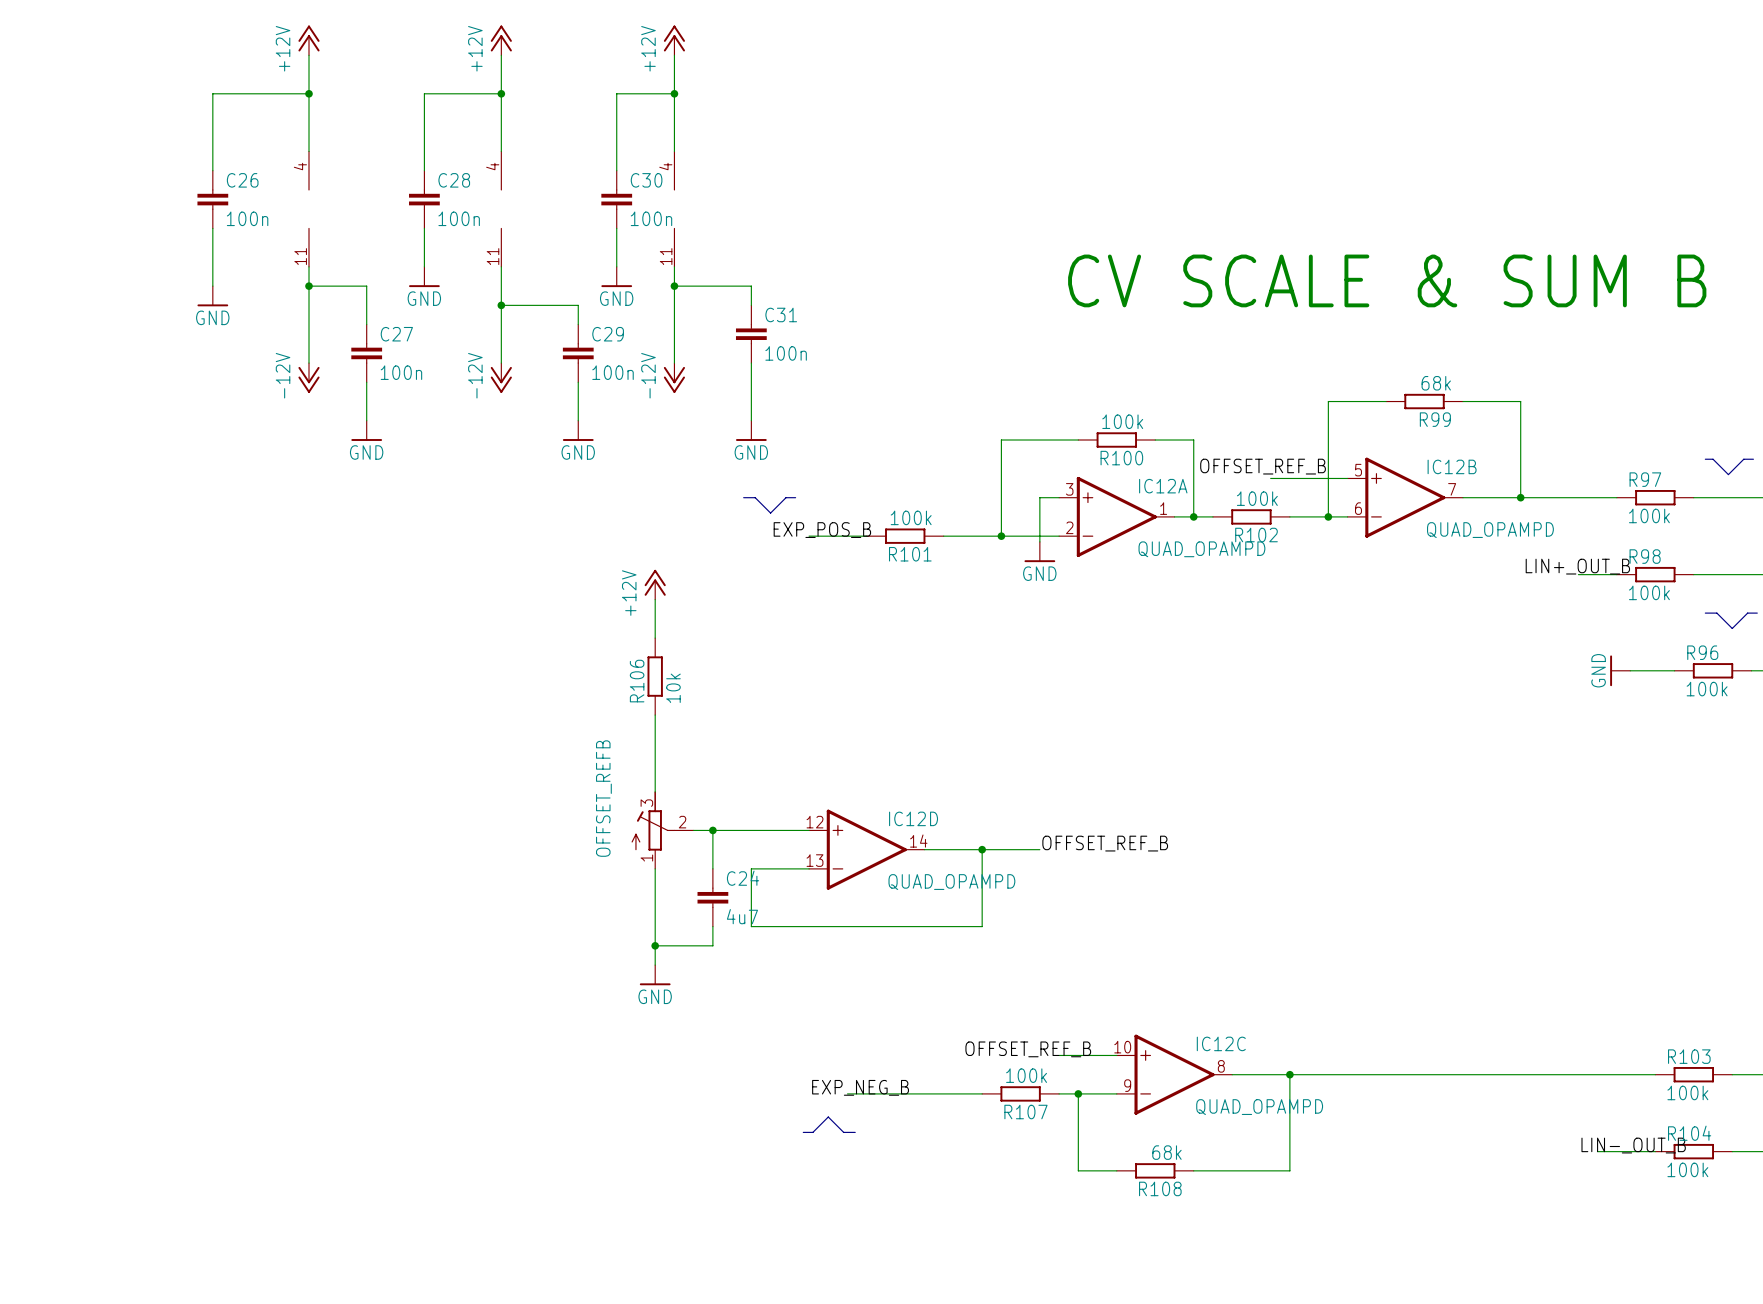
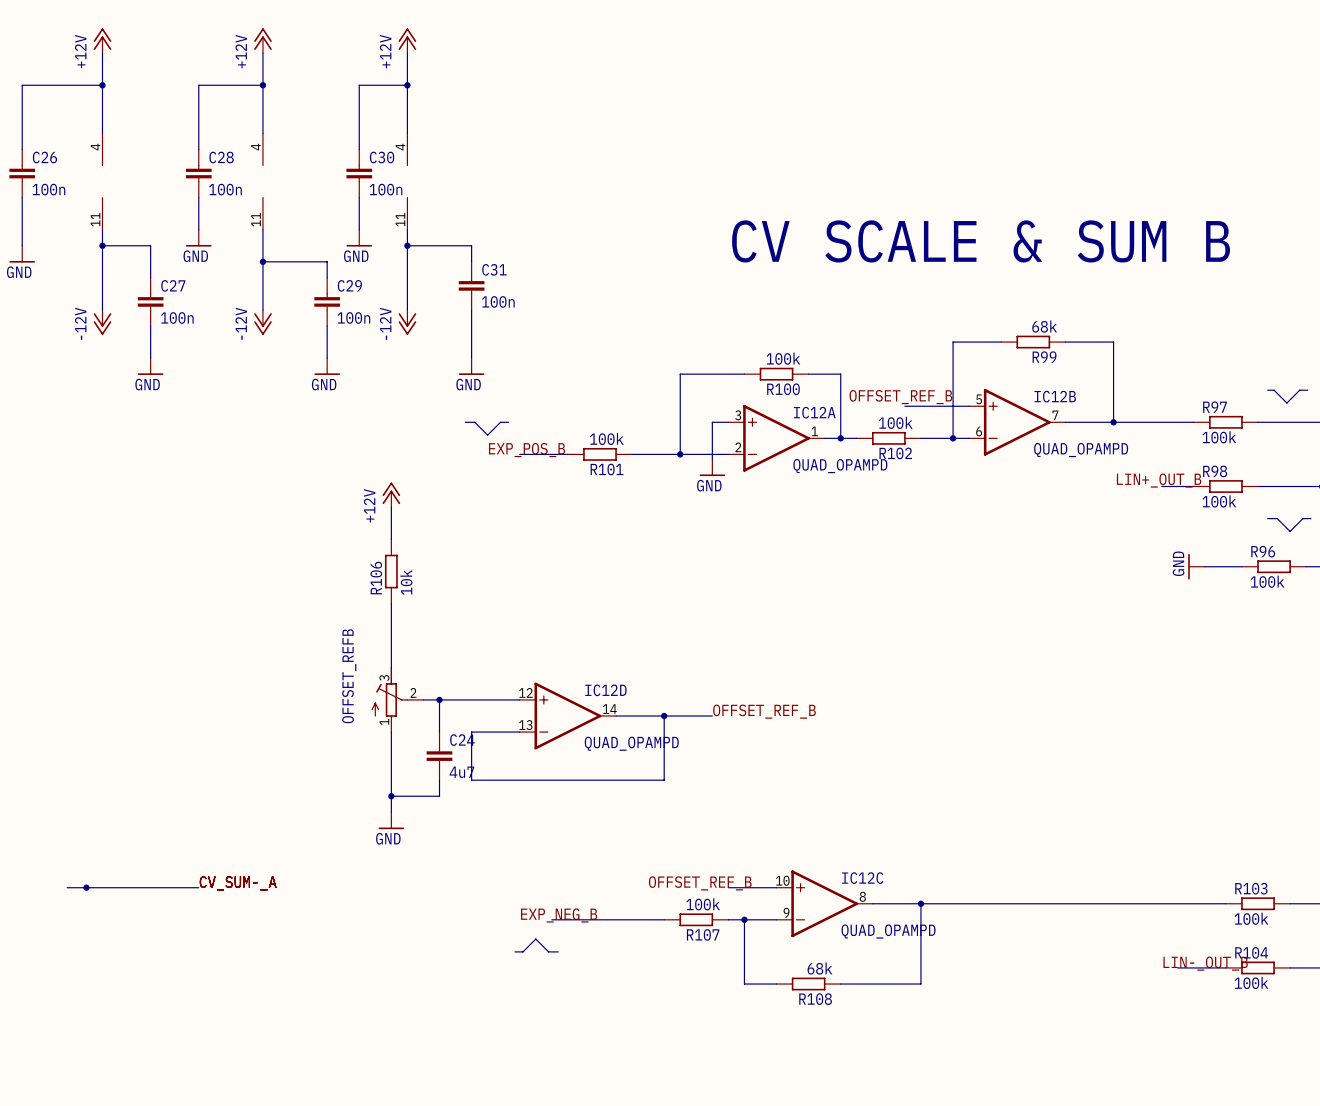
label: none -> CV_SUM-_A (238, 883)
wire: none -> (67, 887) (198, 887)
junction: none -> (86, 887)

